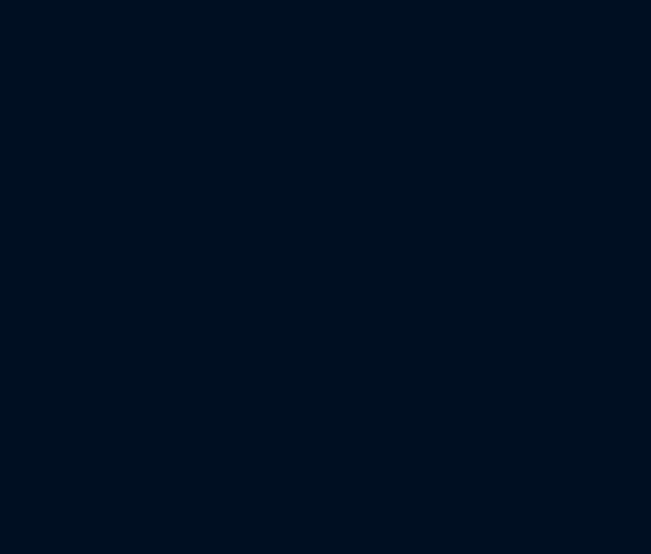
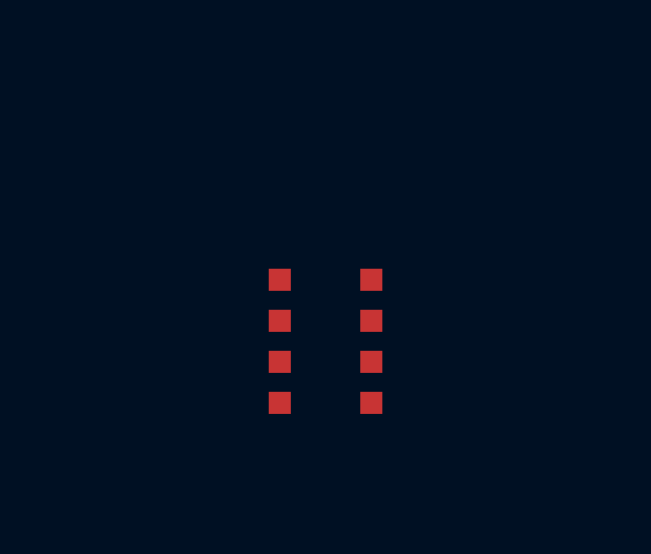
part: none -> (325, 341)

